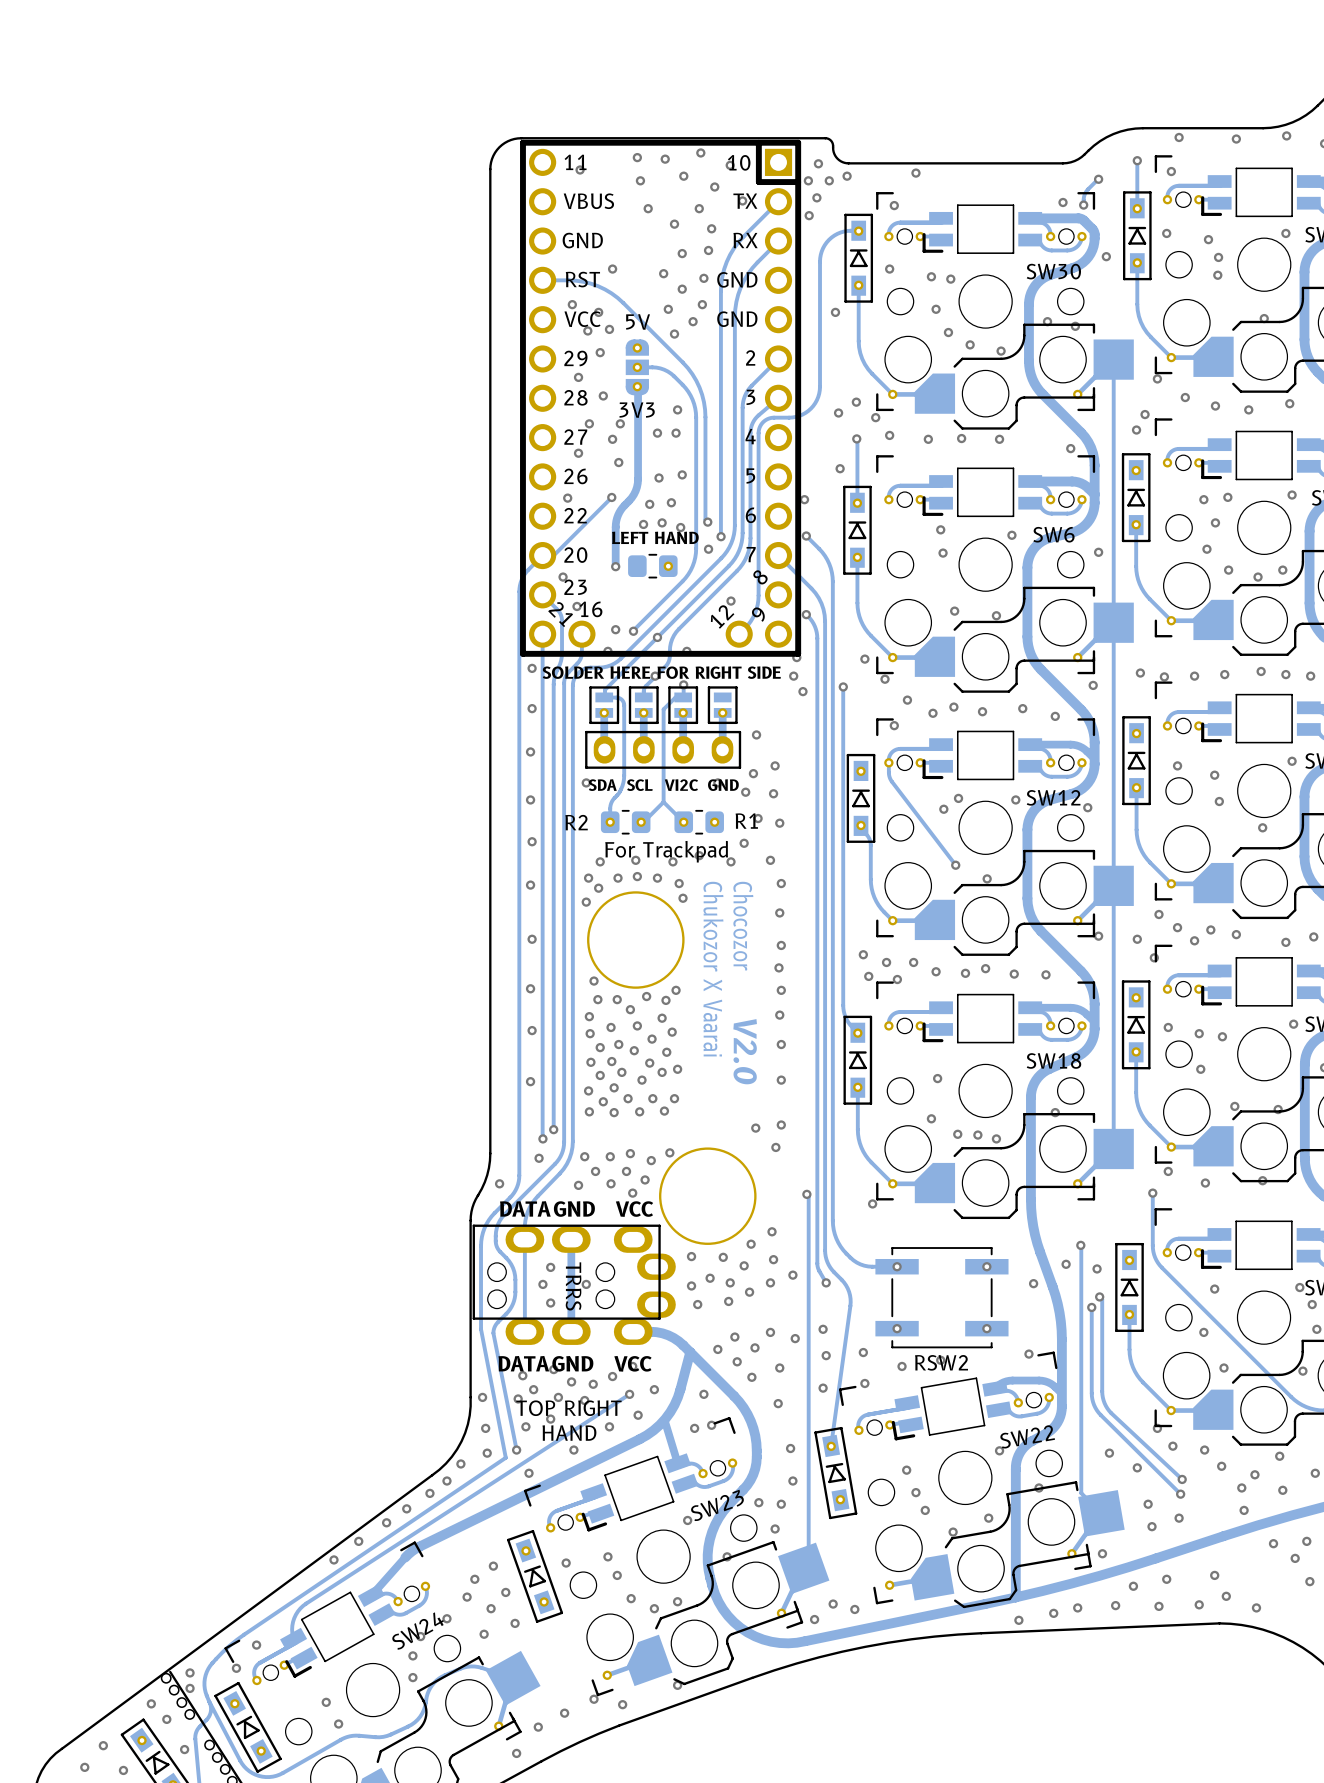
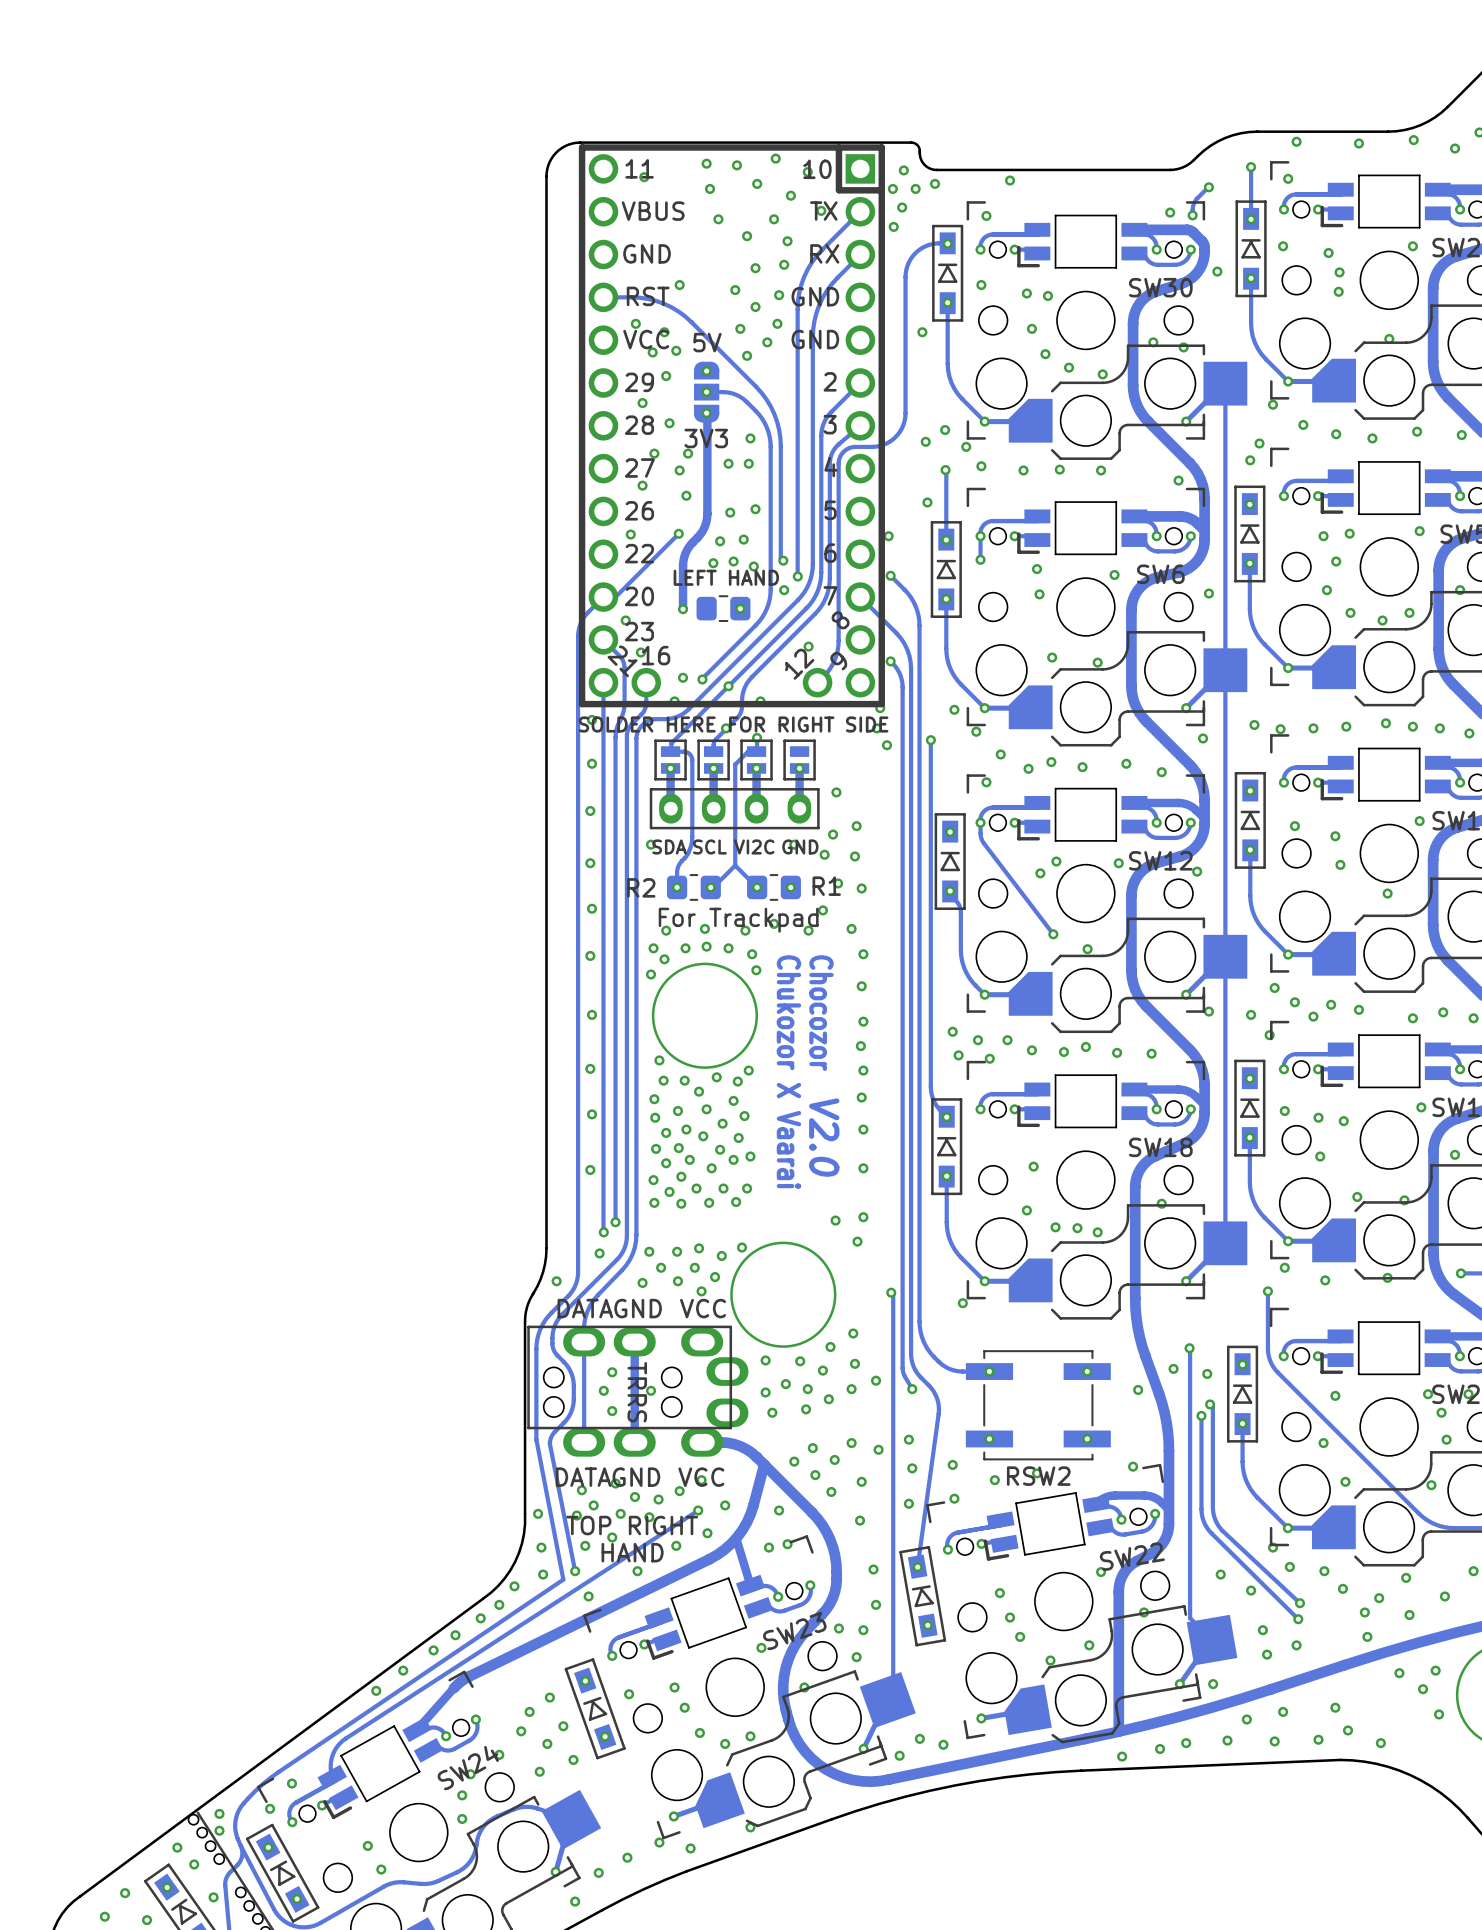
track: none -> (980, 536) (980, 559)
via: none -> (980, 559)

